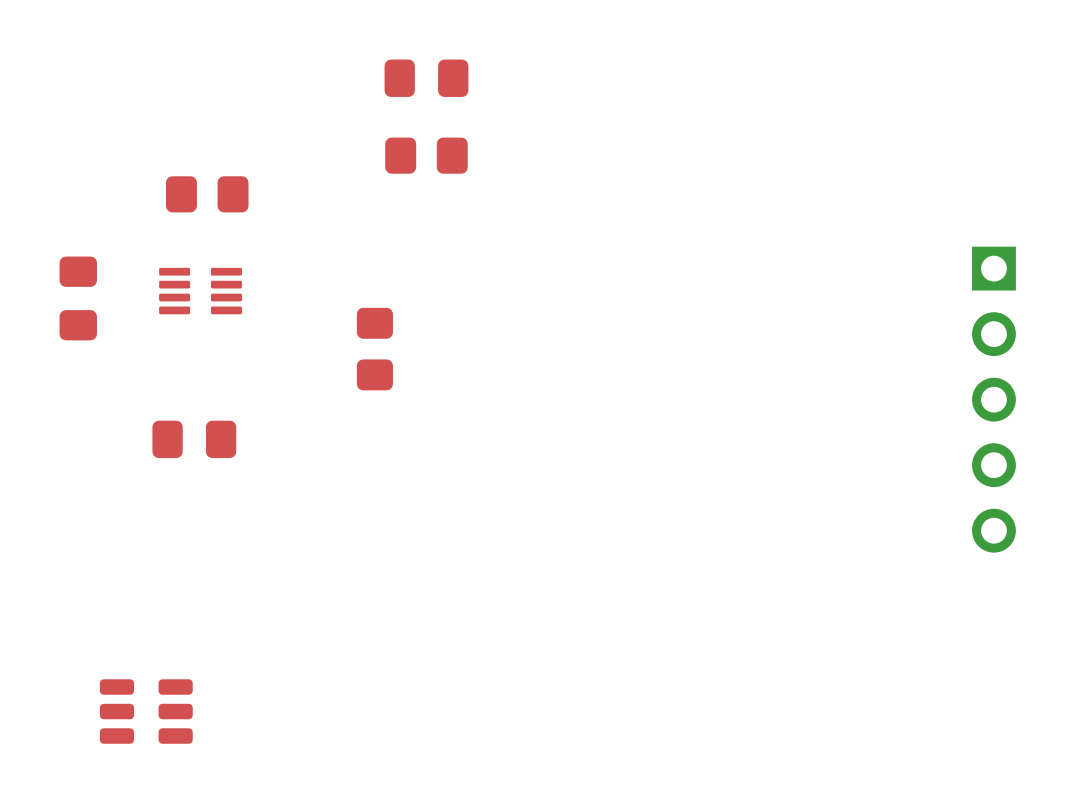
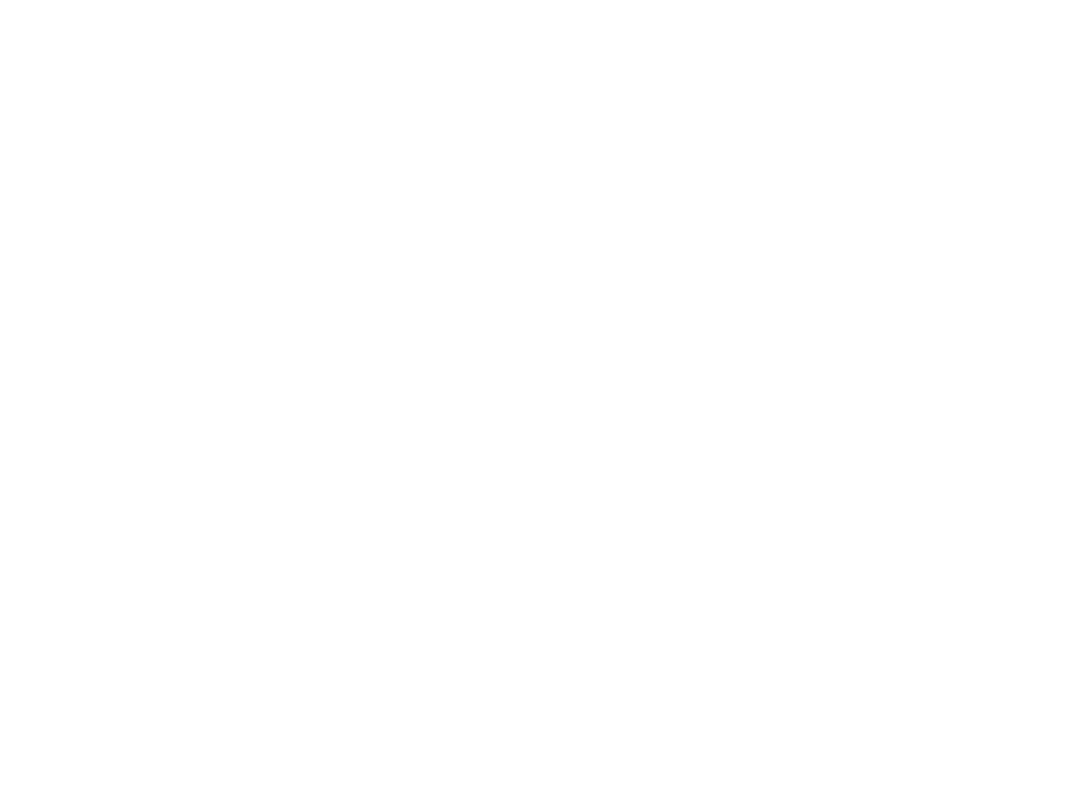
part: (426, 78) -> none
part: (426, 155) -> none
part: (207, 194) -> none
part: (200, 291) -> none
part: (78, 298) -> none
part: (374, 349) -> none
part: (993, 399) -> none
part: (194, 439) -> none
part: (146, 711) -> none

